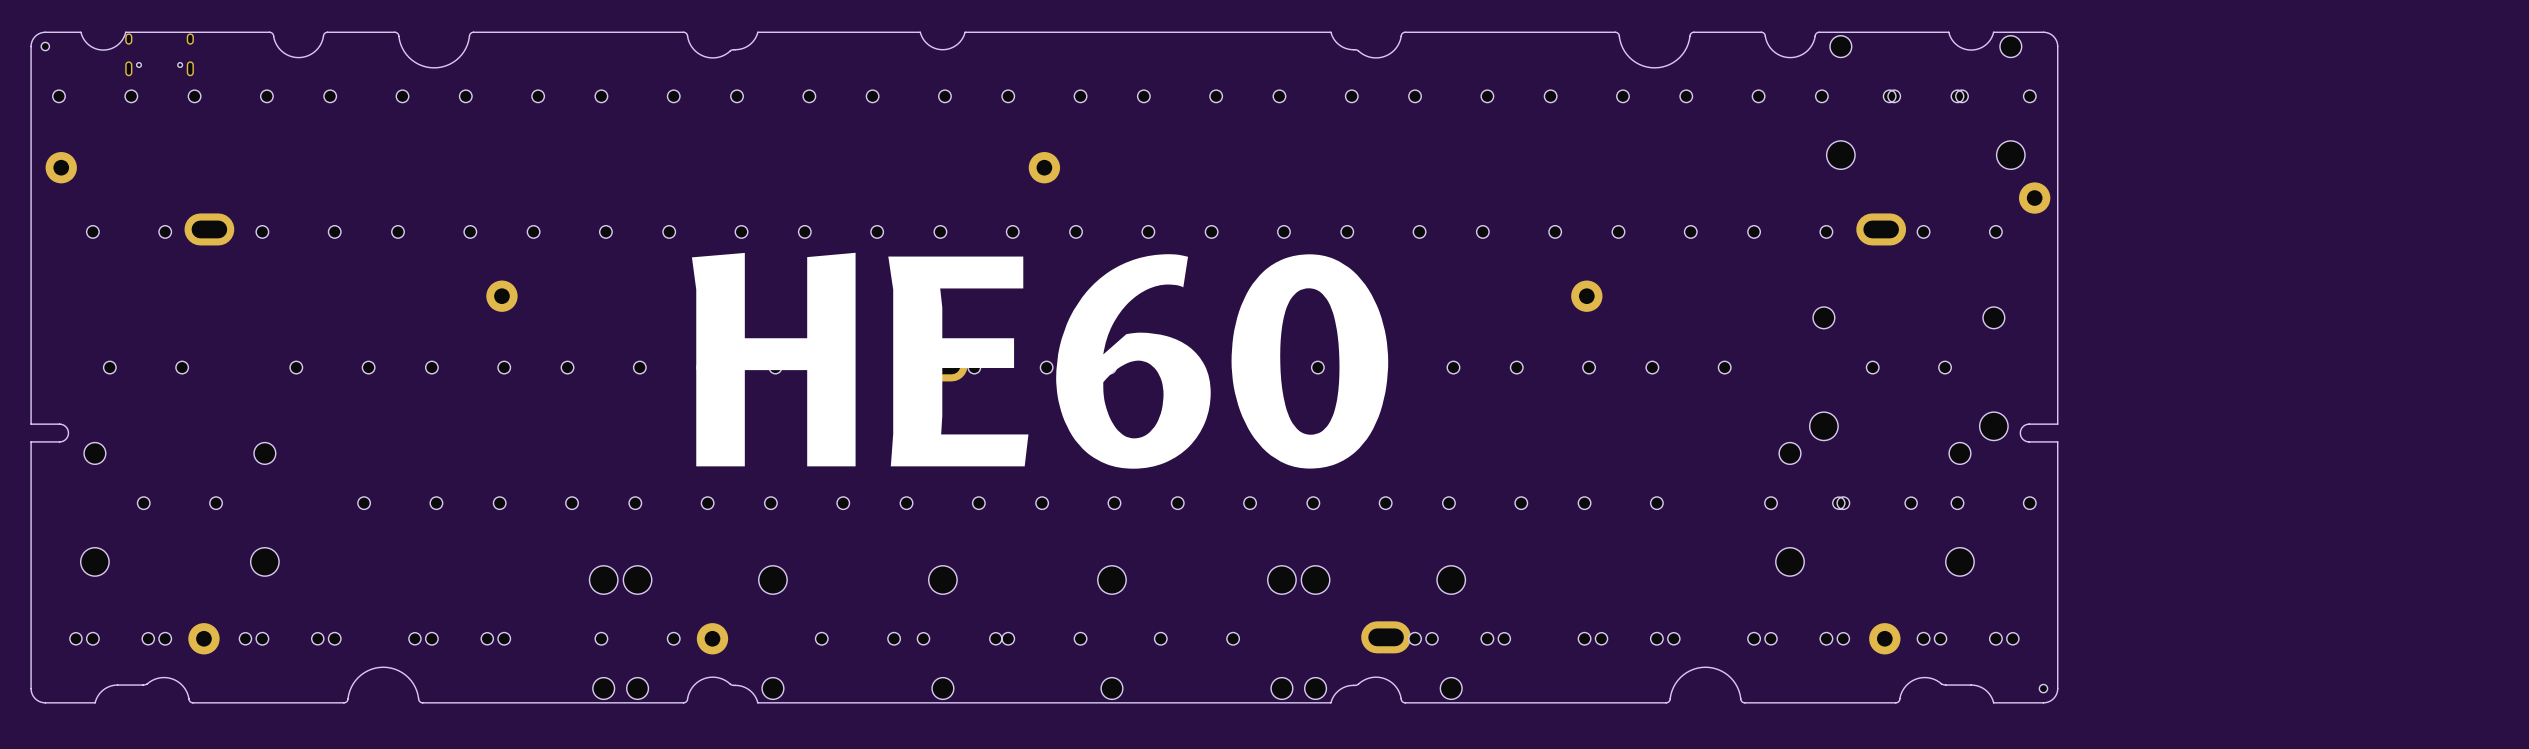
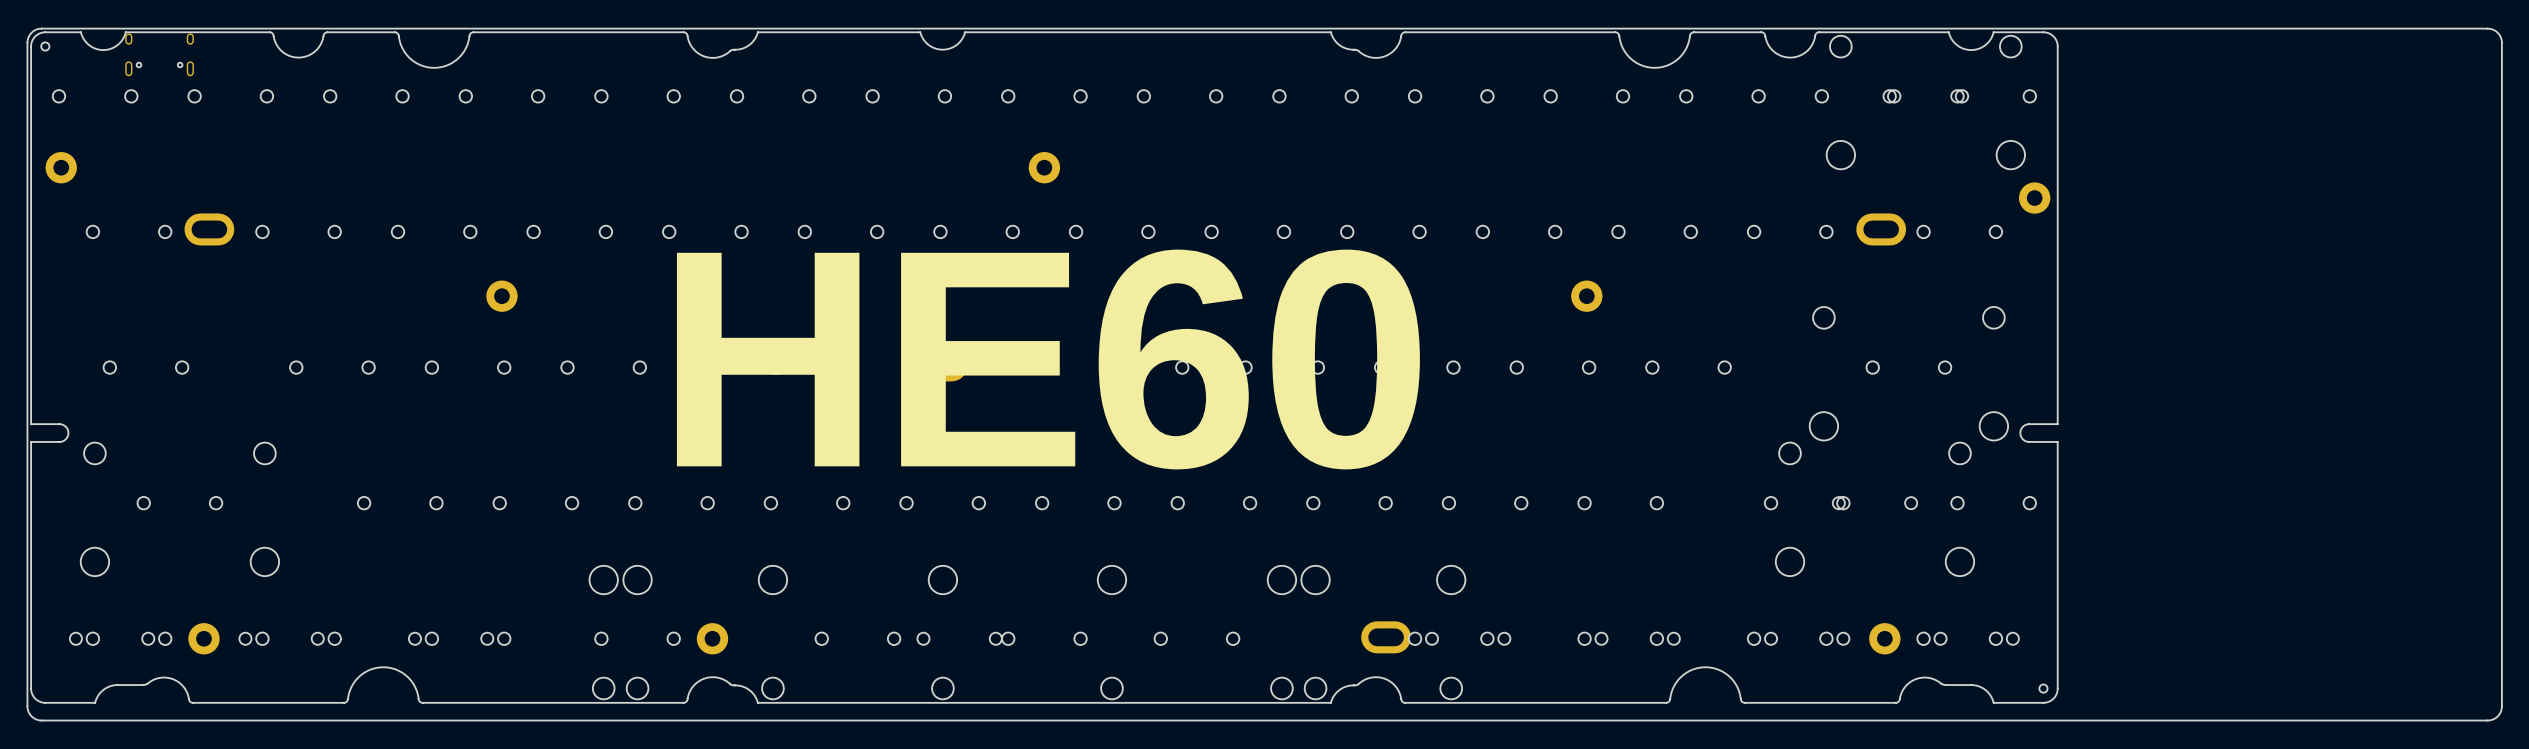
board edge: none -> (41, 28) (2490, 28) (2498, 33) (2501, 42) (2501, 709) (2496, 717) (2487, 720) (38, 720) (30, 715) (27, 706) (27, 42) (31, 32) (41, 28)

